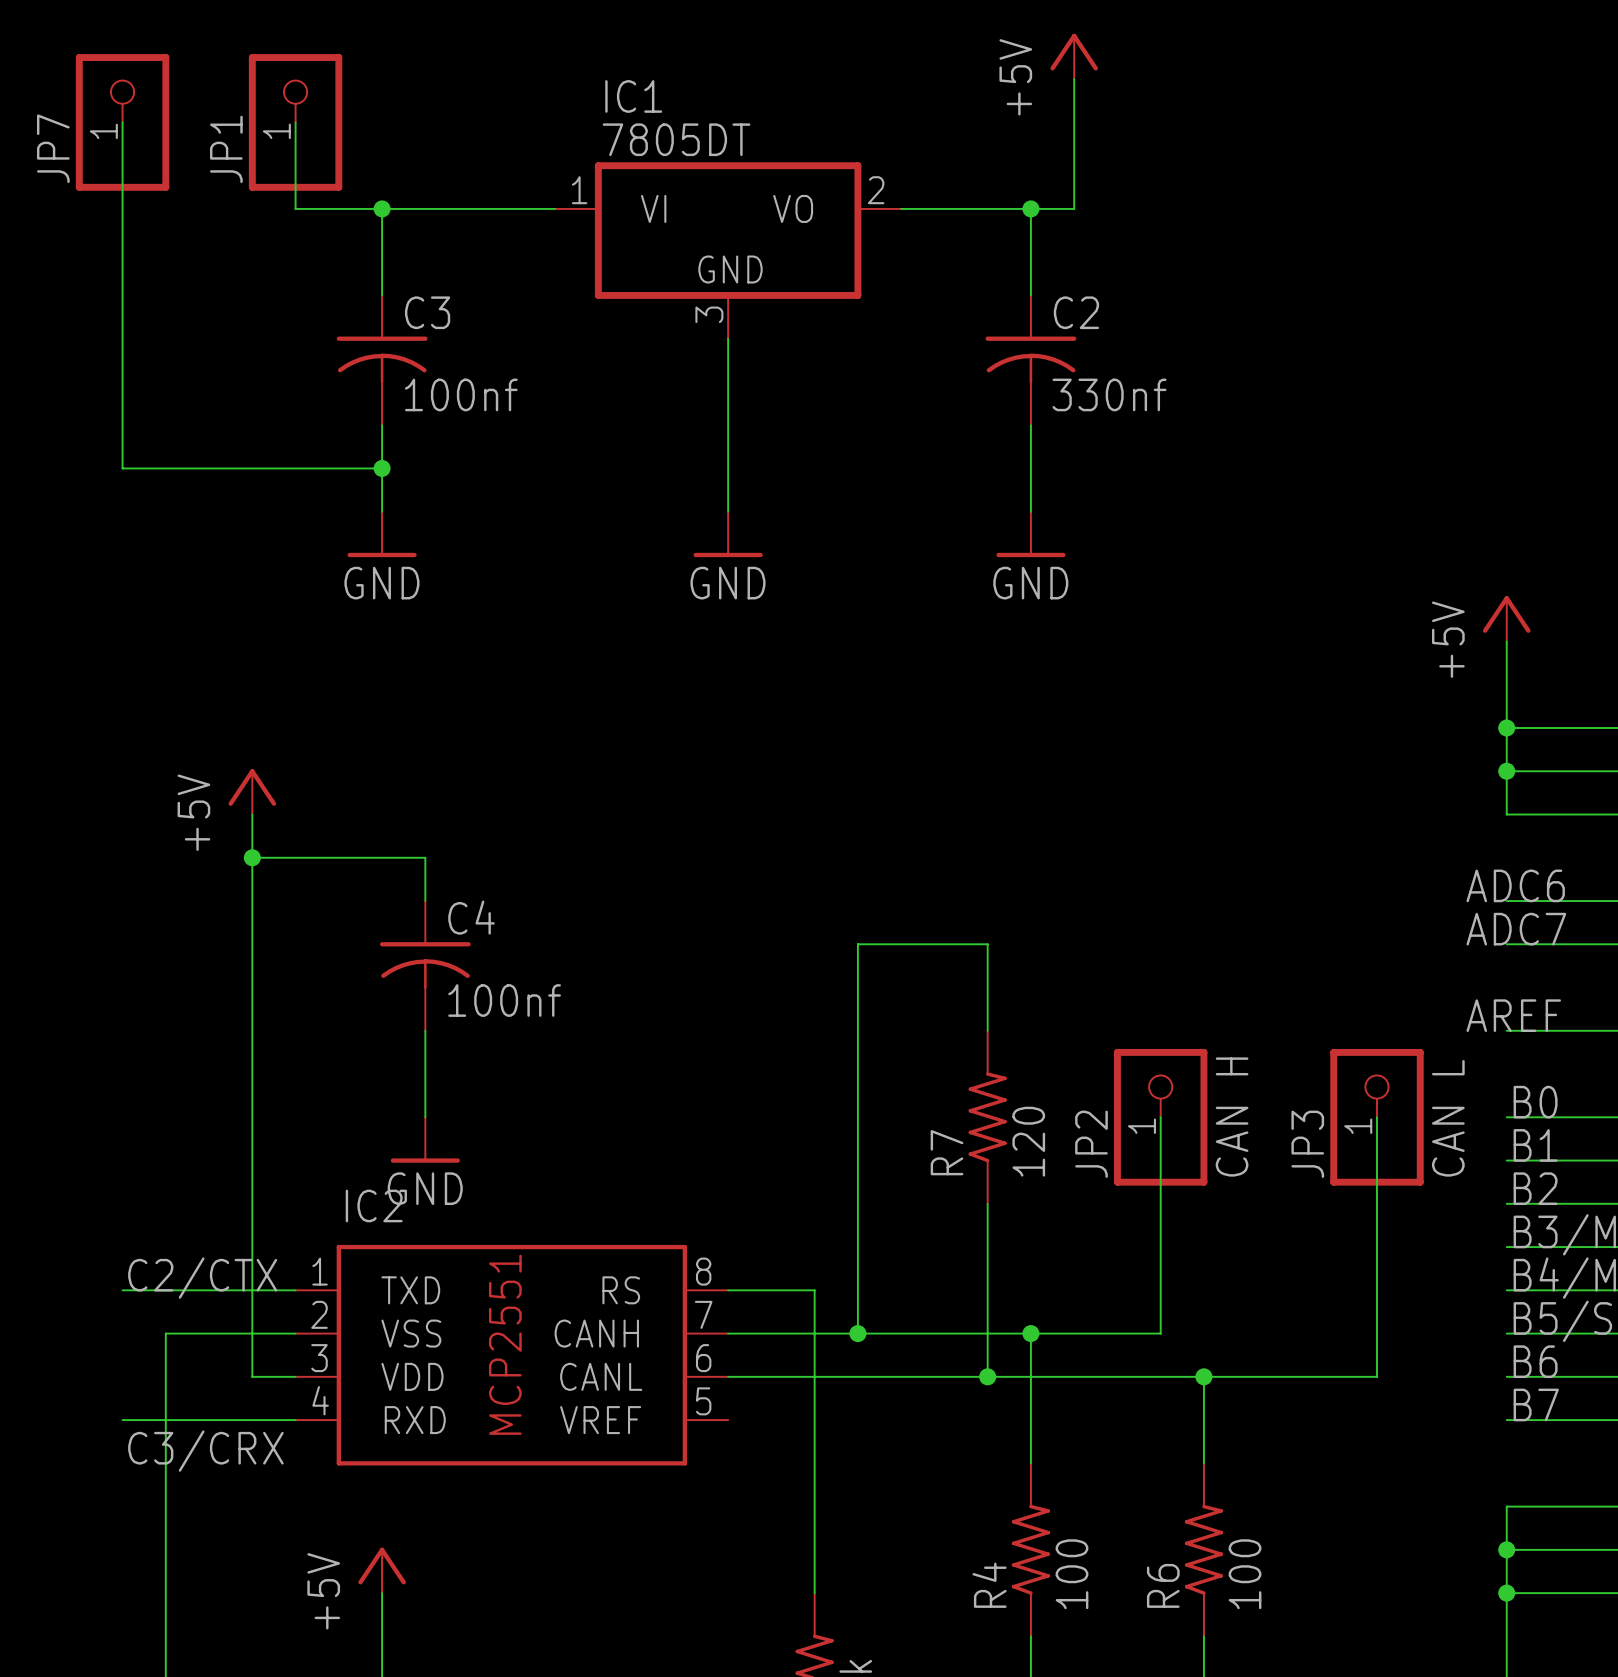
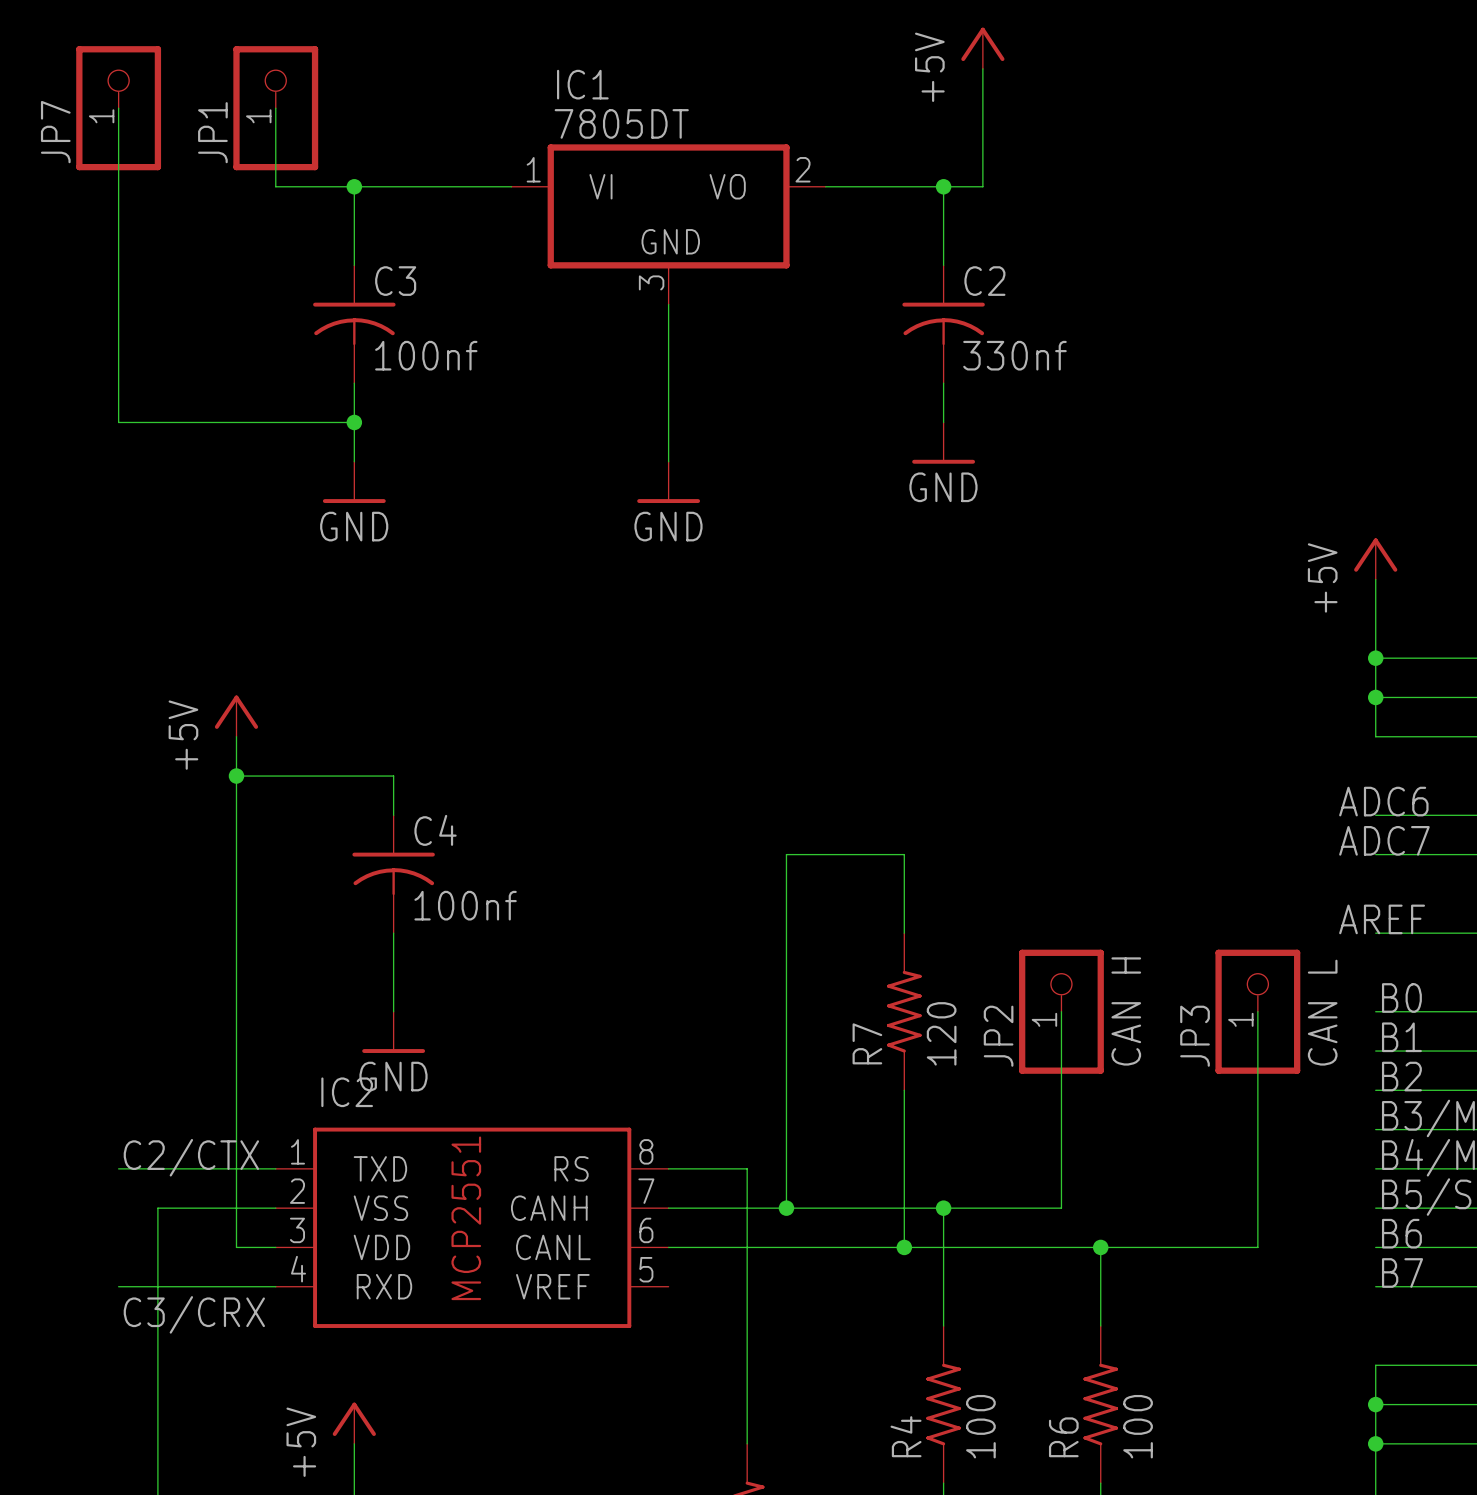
power symbol position: GND (1030, 534) -> GND (943, 443)

